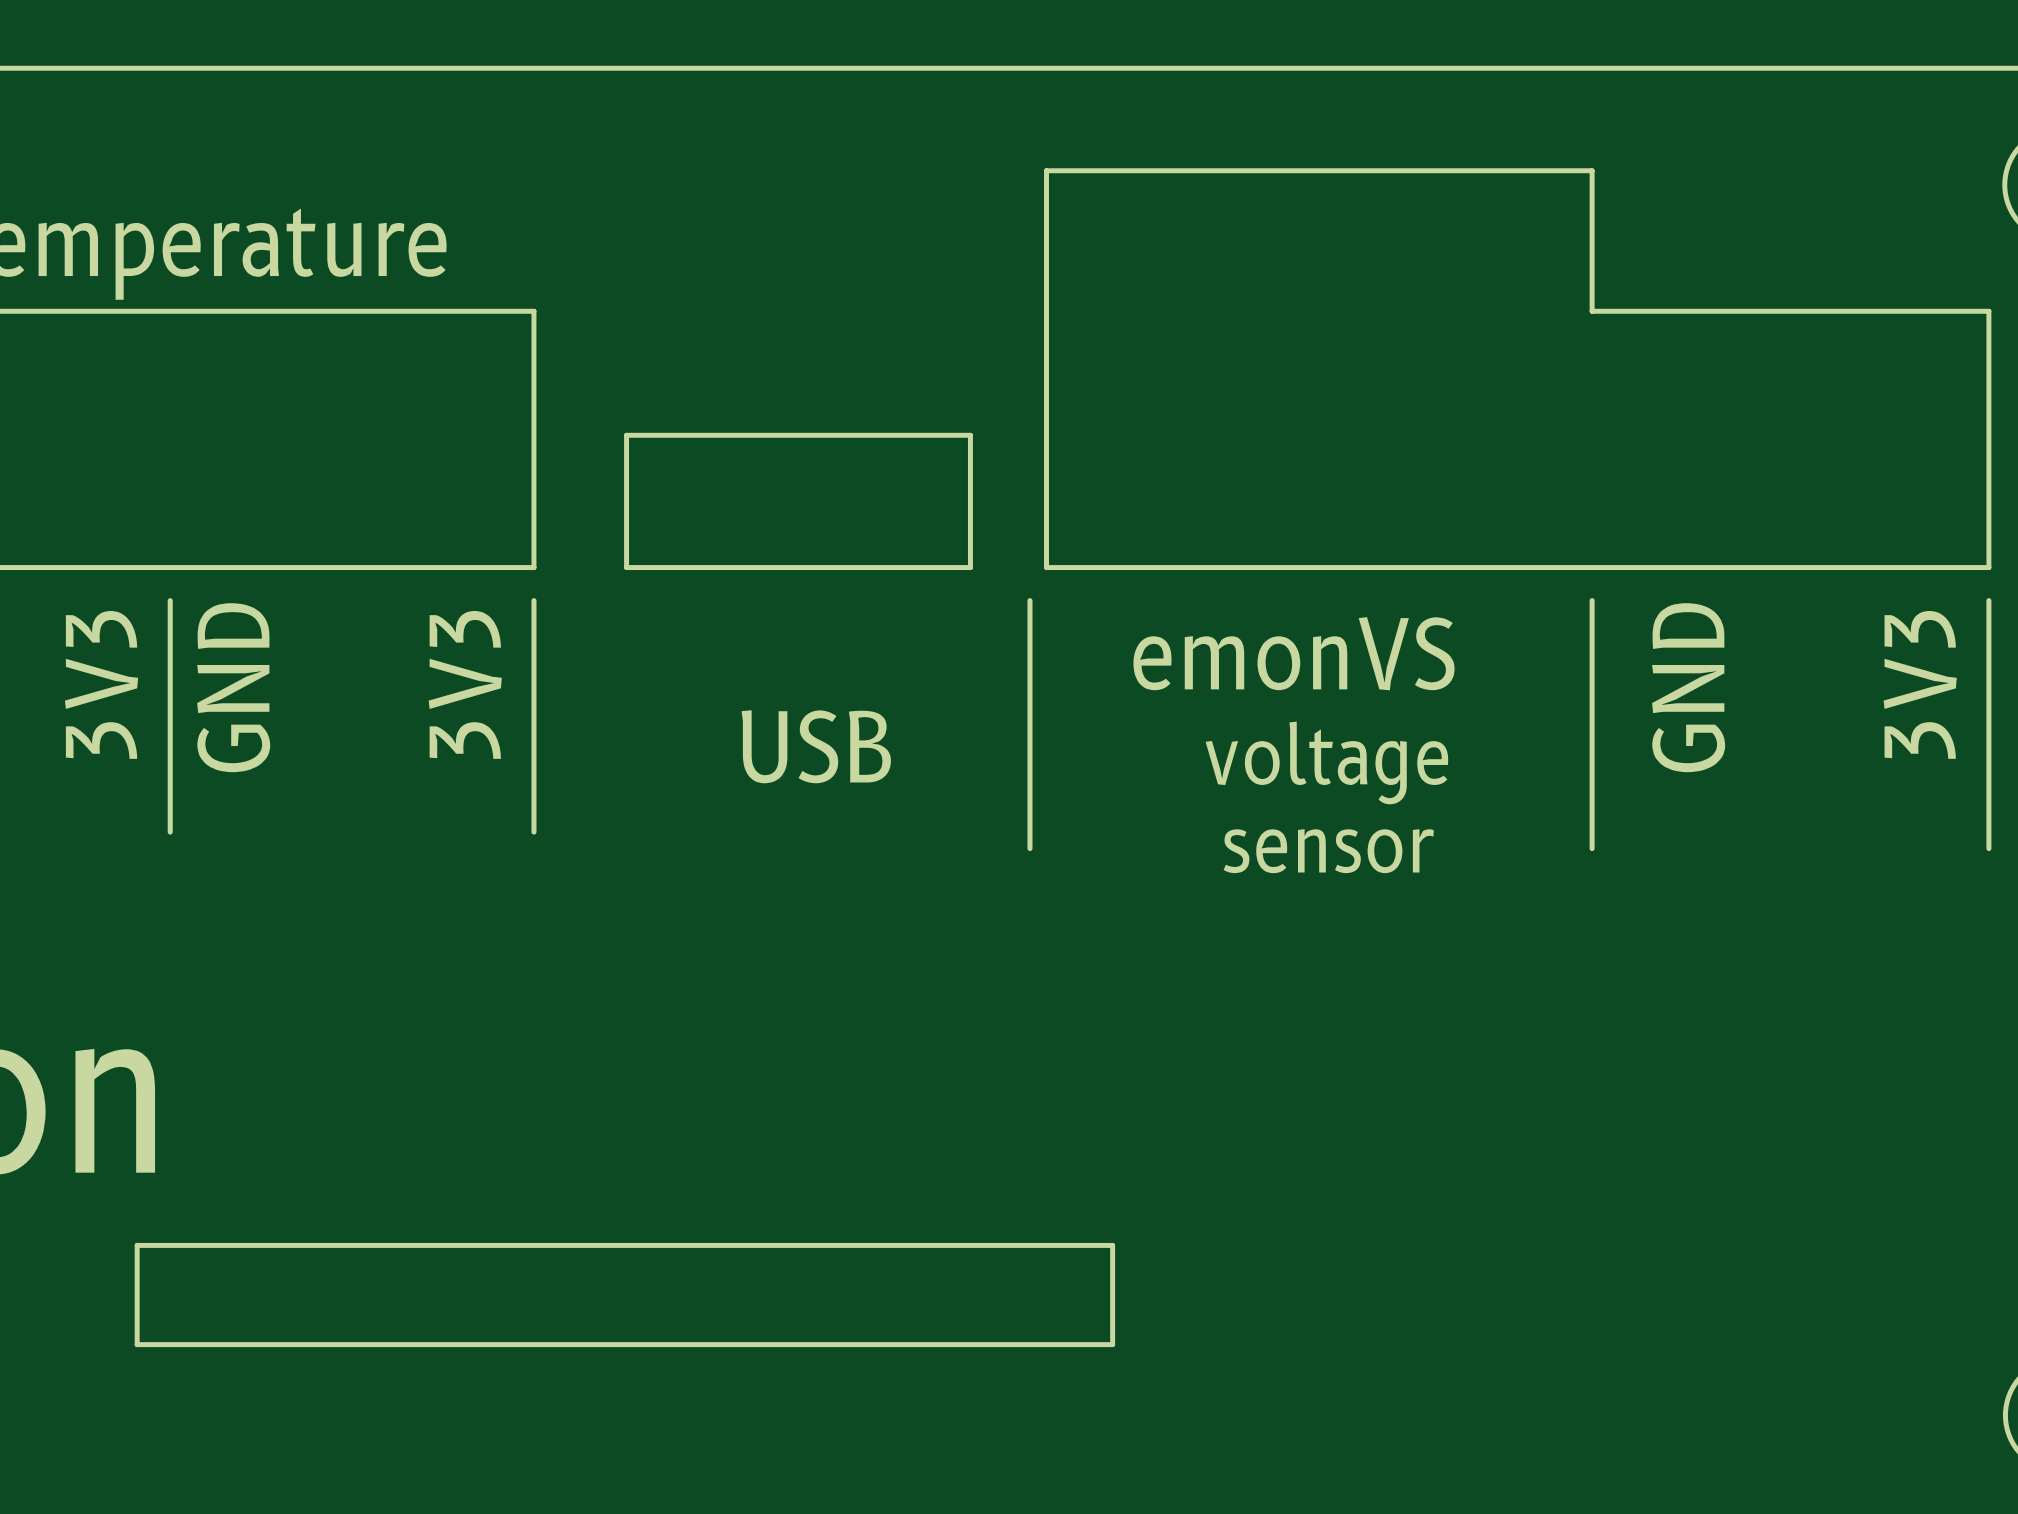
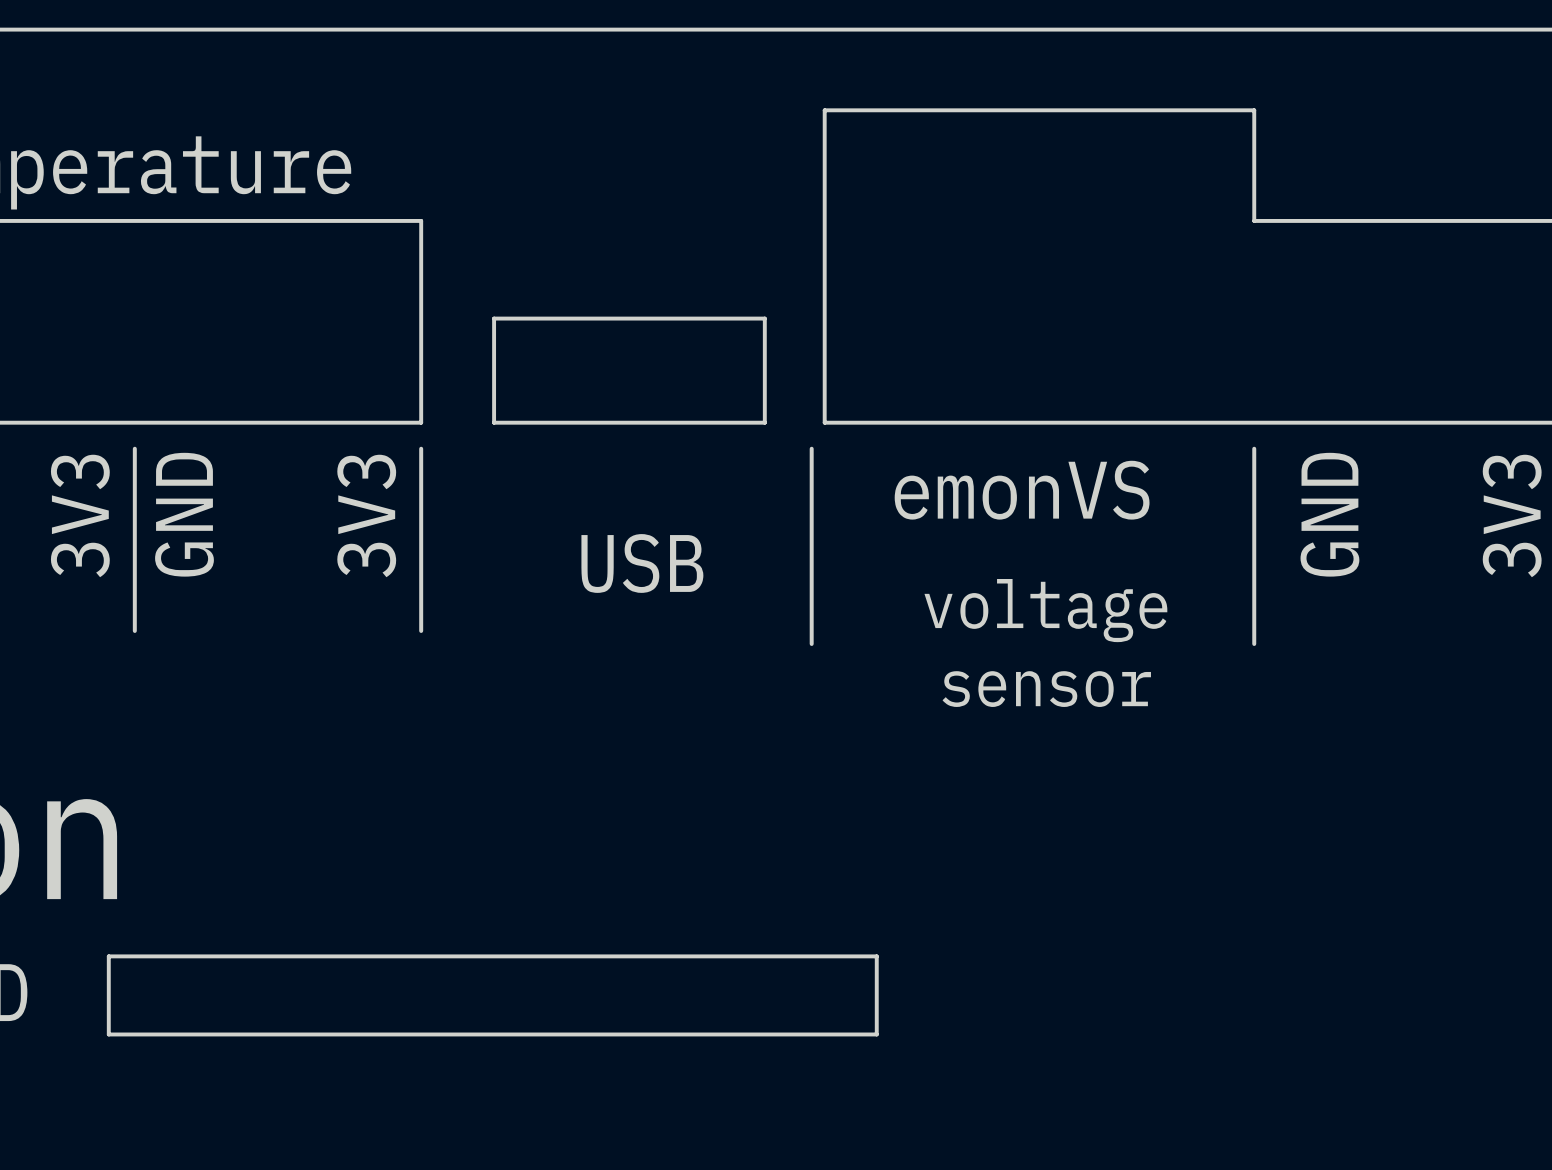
text position: voltage (1326, 762) -> voltage (1045, 610)
text position: sensor (1328, 851) -> sensor (1046, 689)

